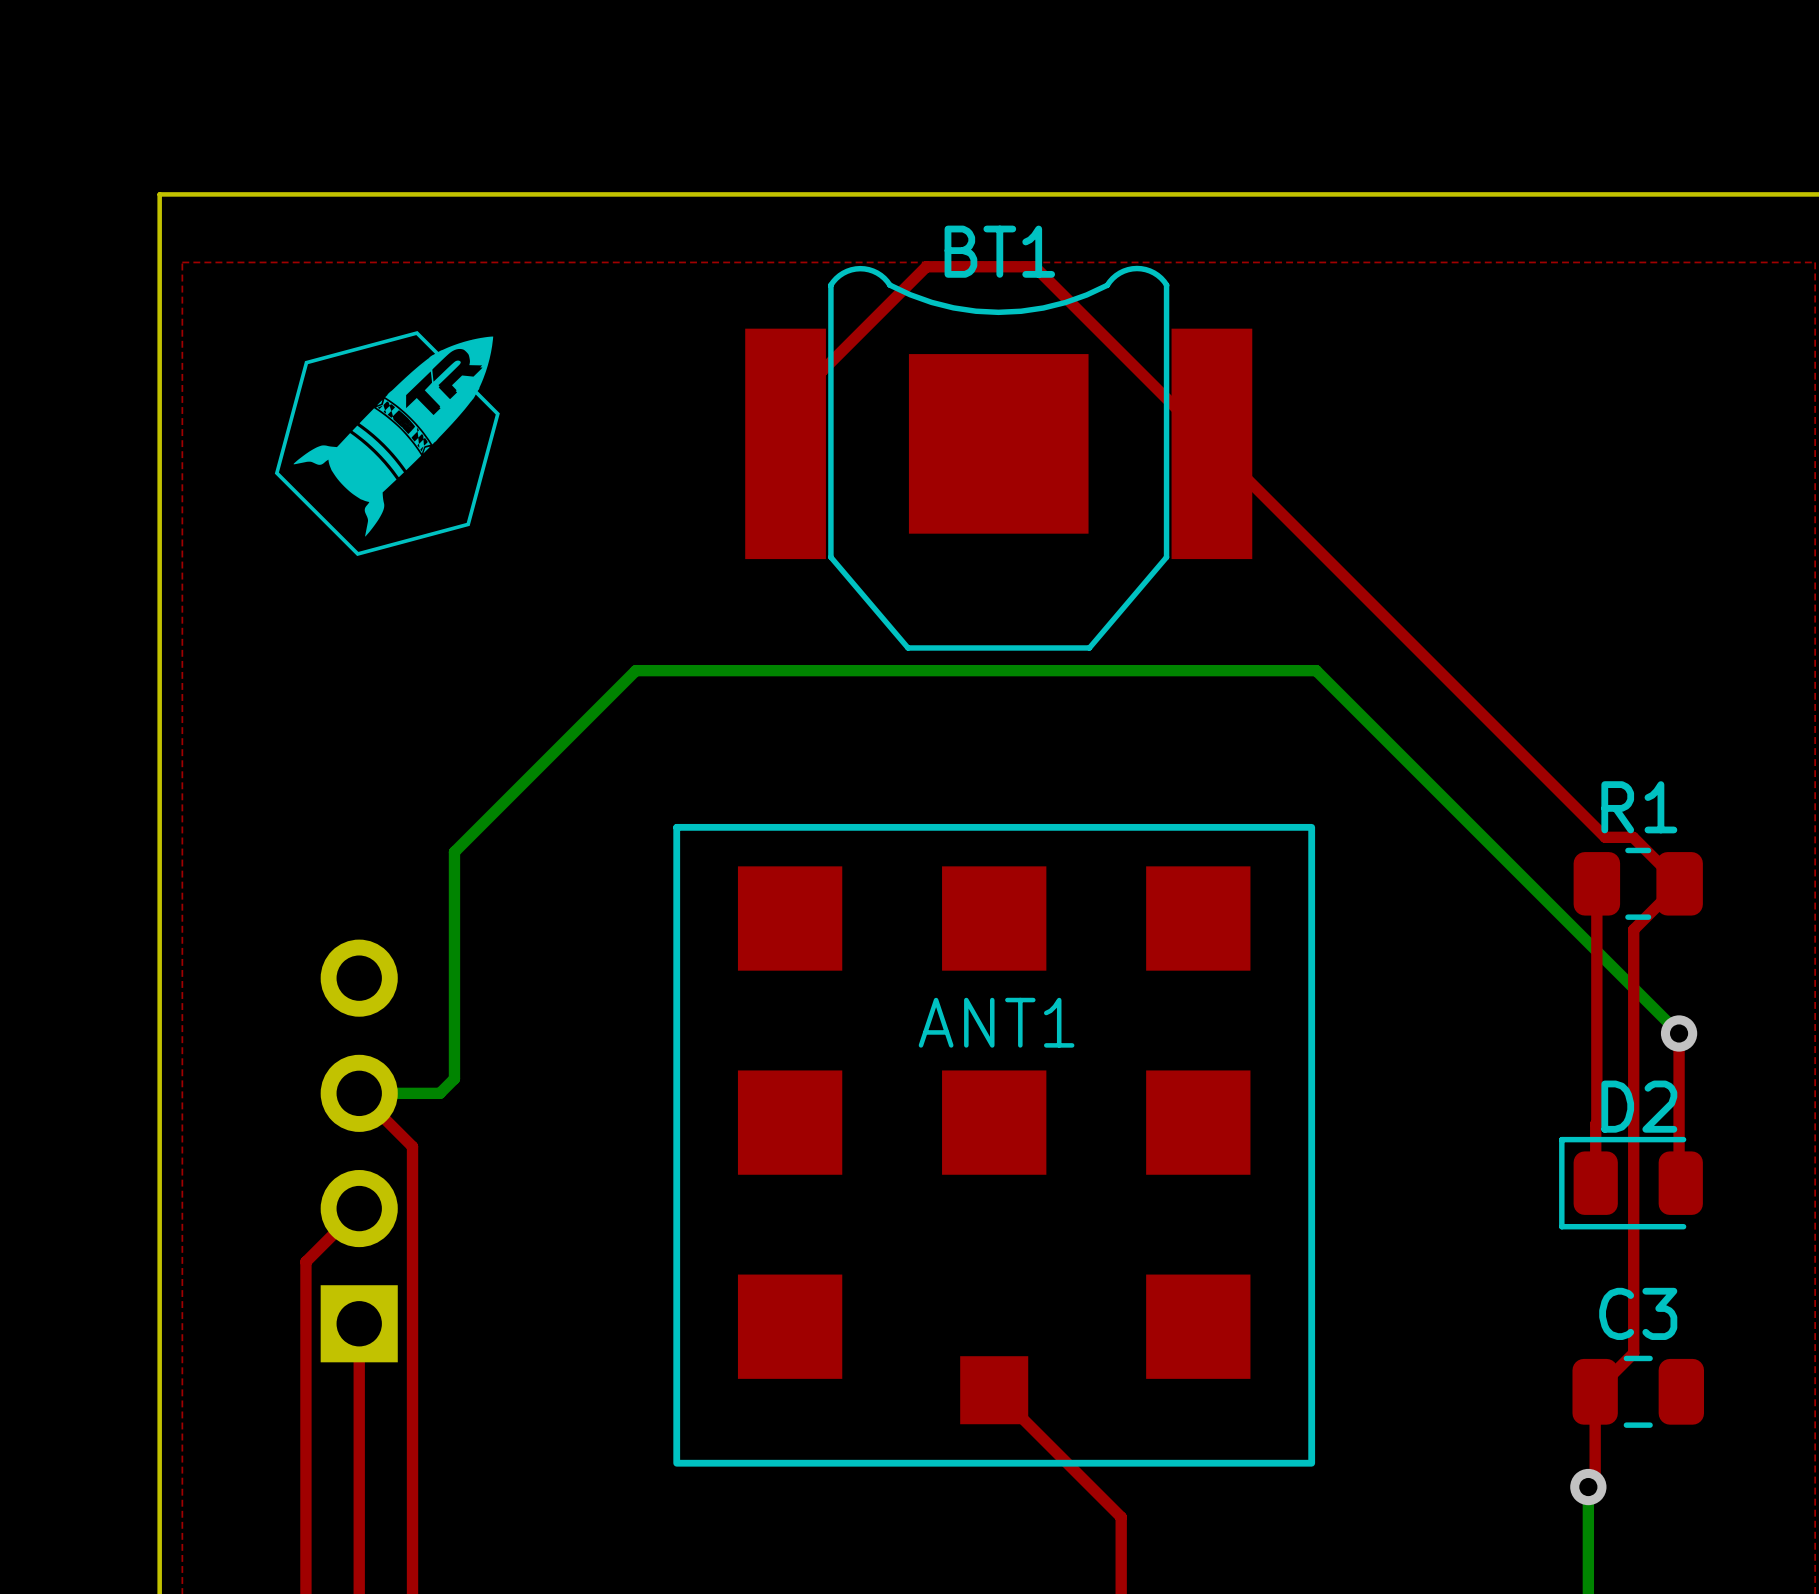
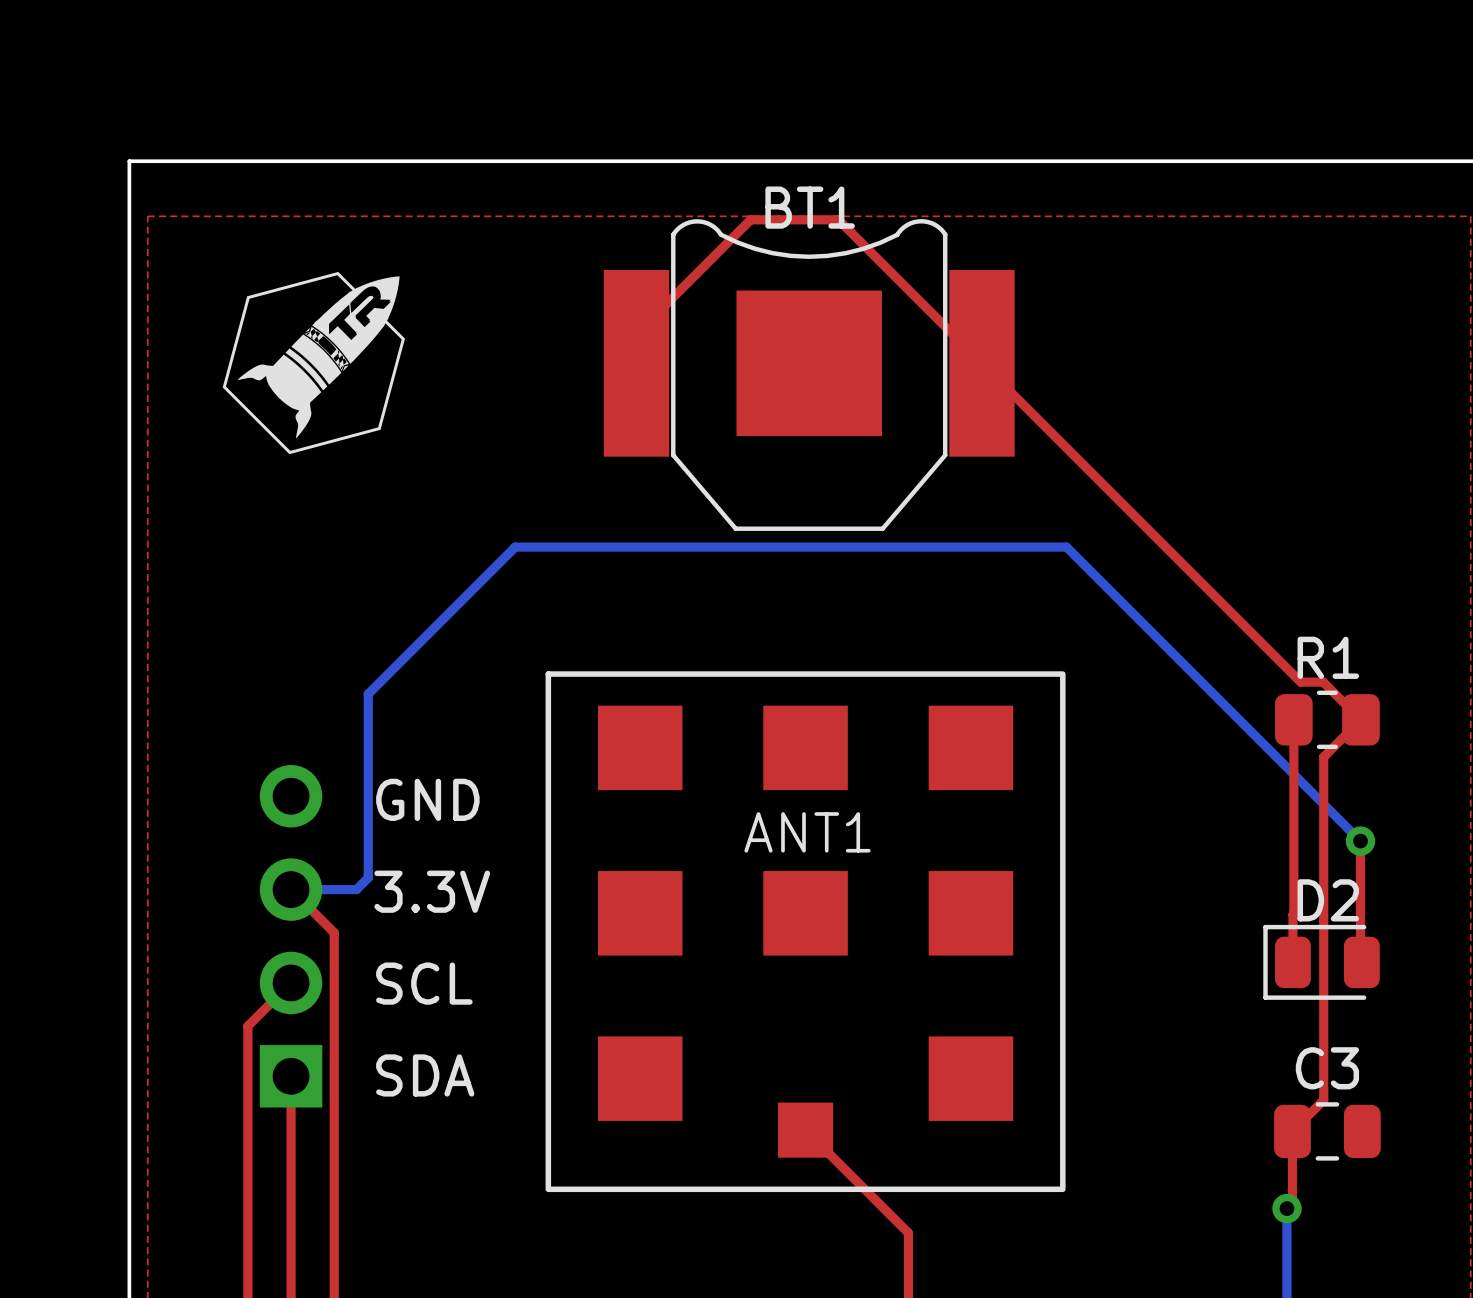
text: none -> GND (427, 799)
text: none -> 3.3V (432, 891)
text: none -> SCL (424, 983)
text: none -> SDA (425, 1075)

